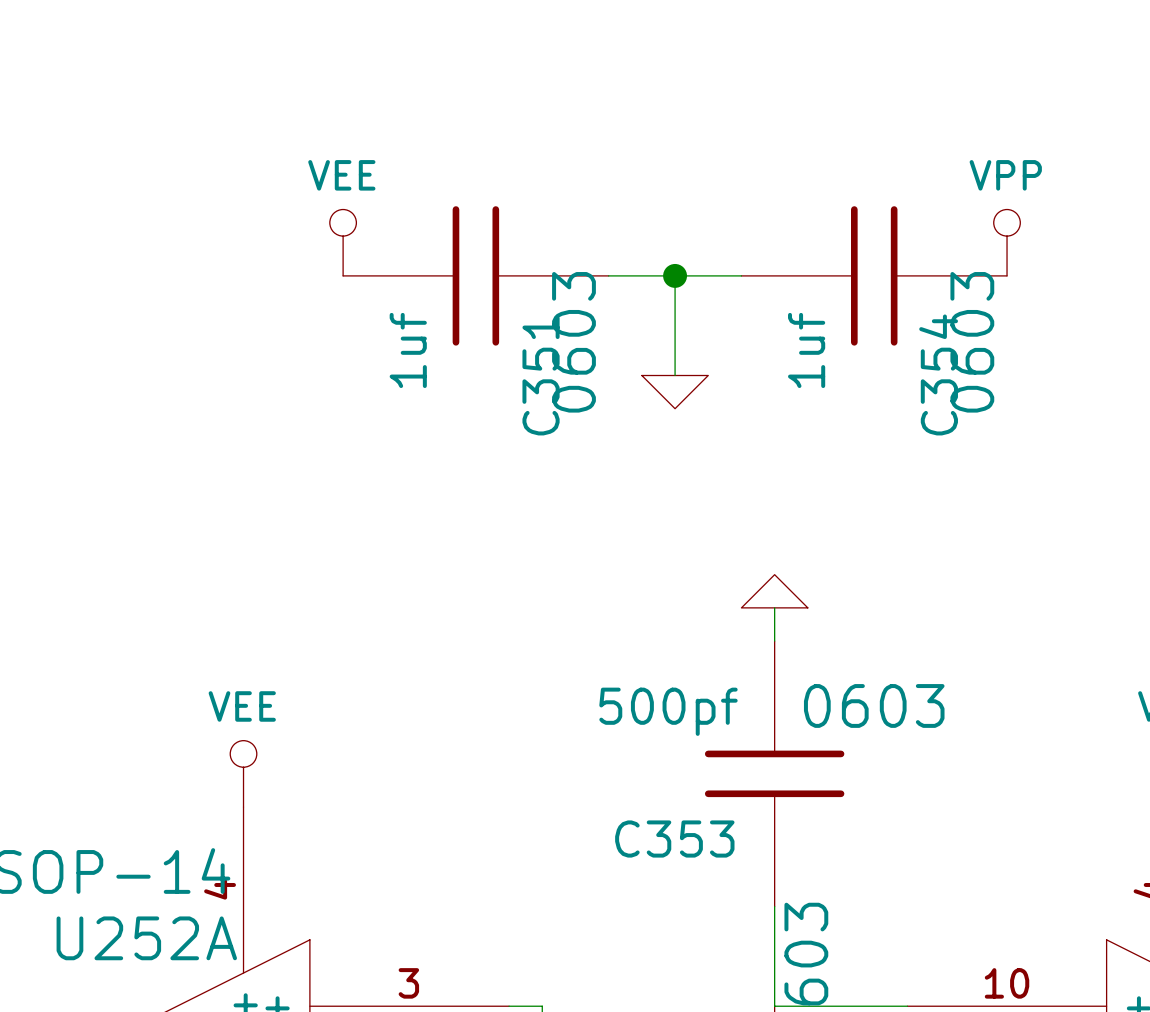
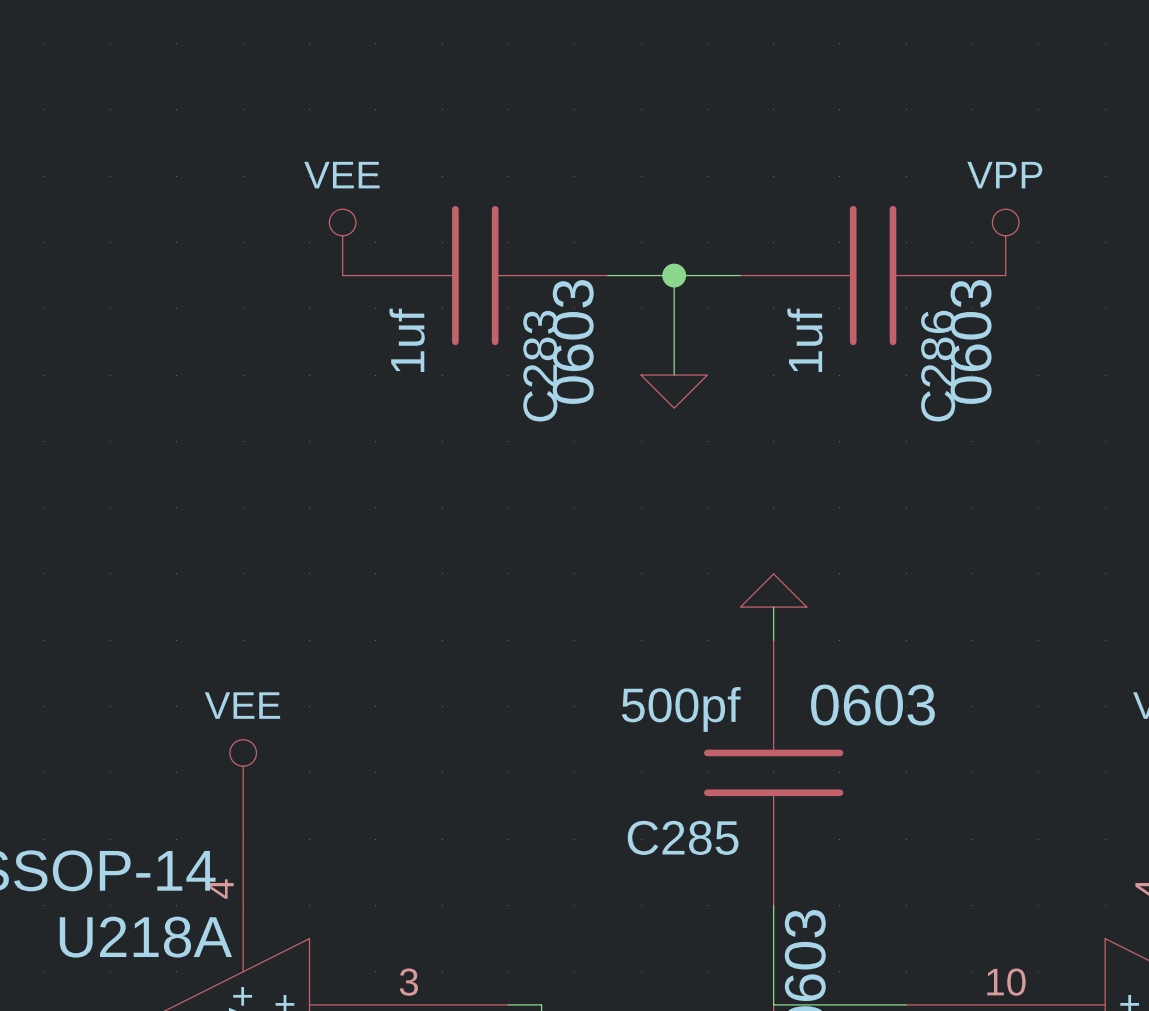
C354 name: C354 (938, 374) -> C286 (938, 366)
C351 name: C351 (541, 375) -> C283 (540, 366)
C353 name: C353 (674, 839) -> C285 (683, 837)
U252A name: U252A (146, 938) -> U218A (145, 937)

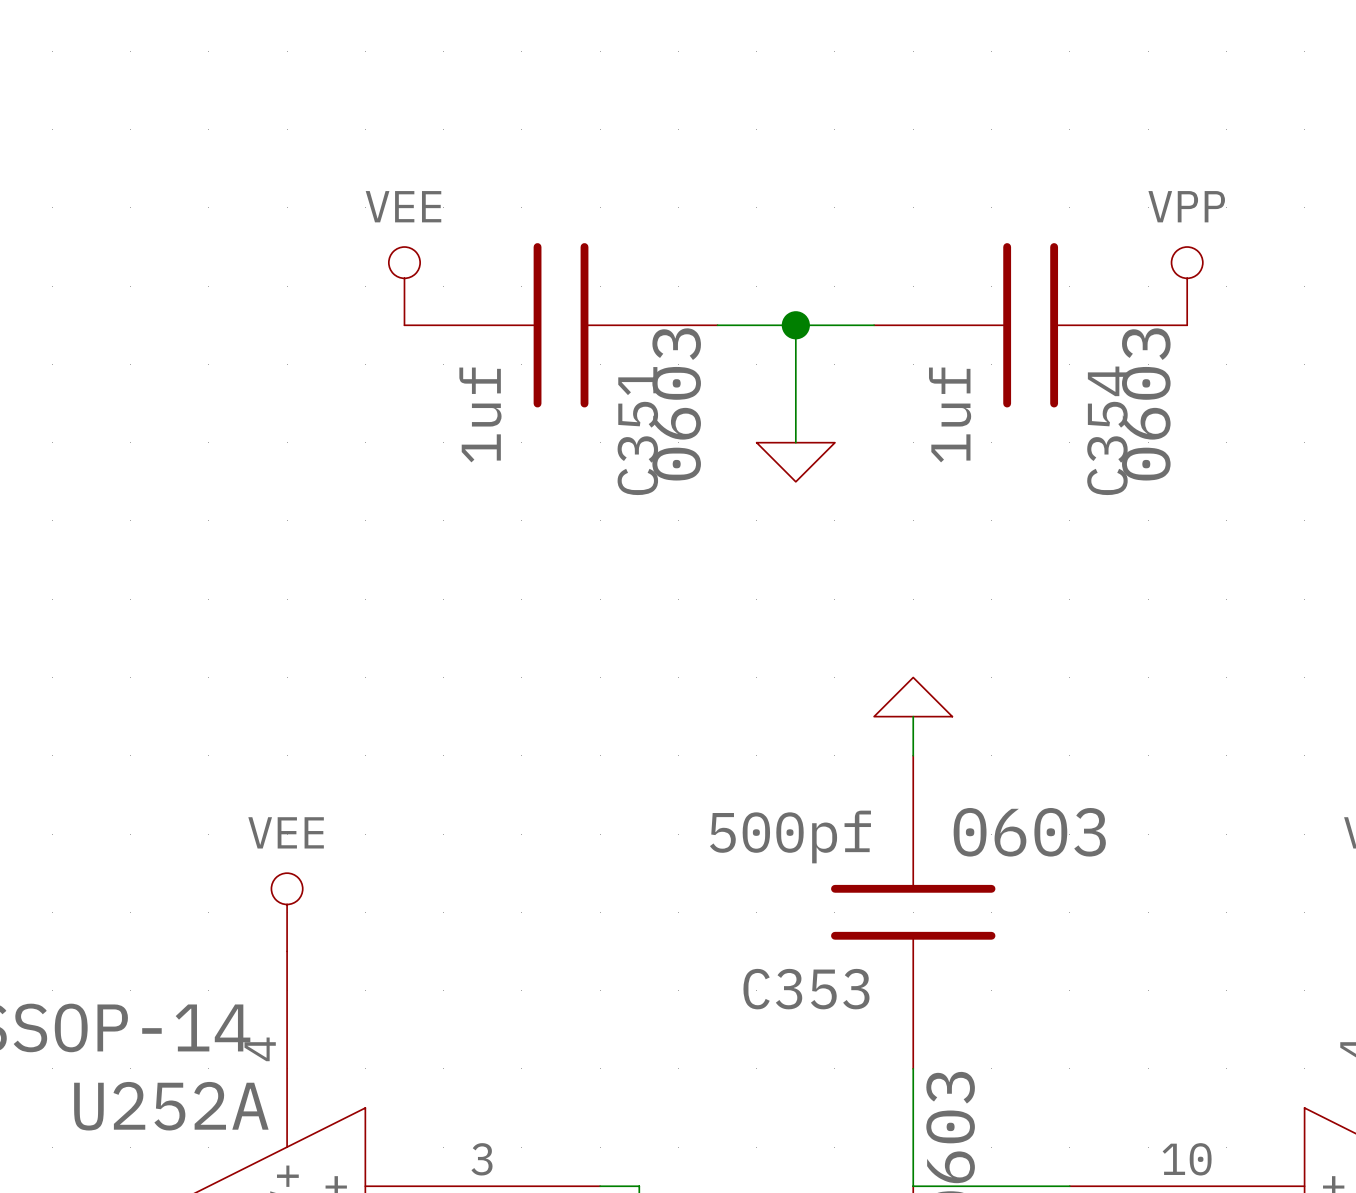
C283 name: C283 (540, 366) -> C351 (637, 431)
C286 name: C286 (938, 366) -> C354 (1107, 430)
C285 name: C285 (683, 837) -> C353 (806, 989)
U218A name: U218A (145, 937) -> U252A (171, 1106)

